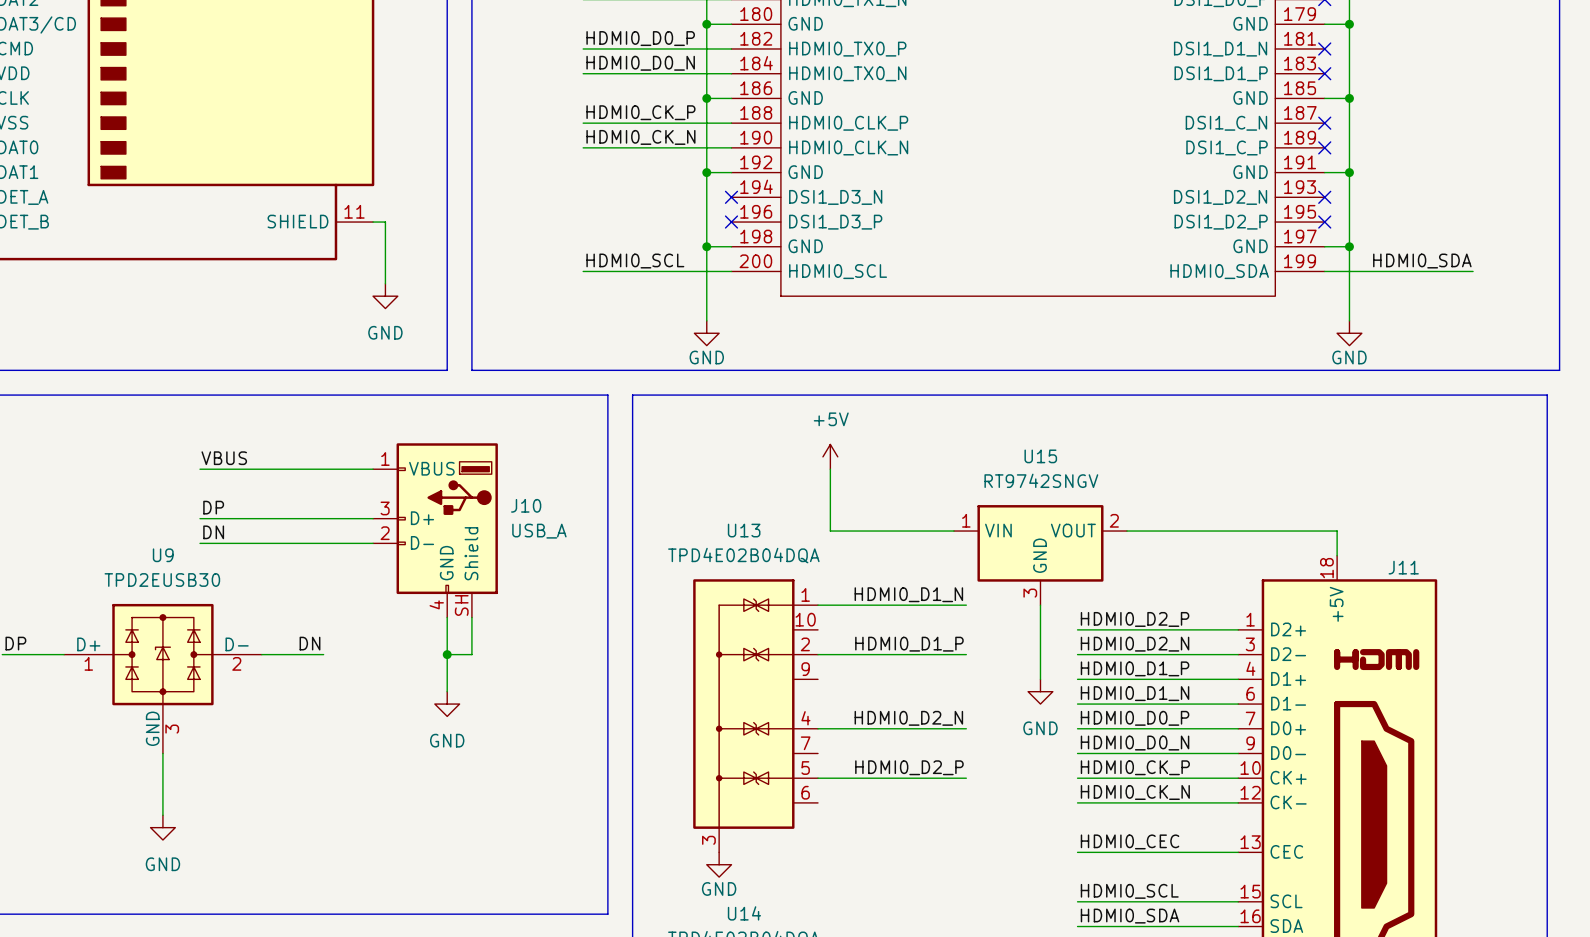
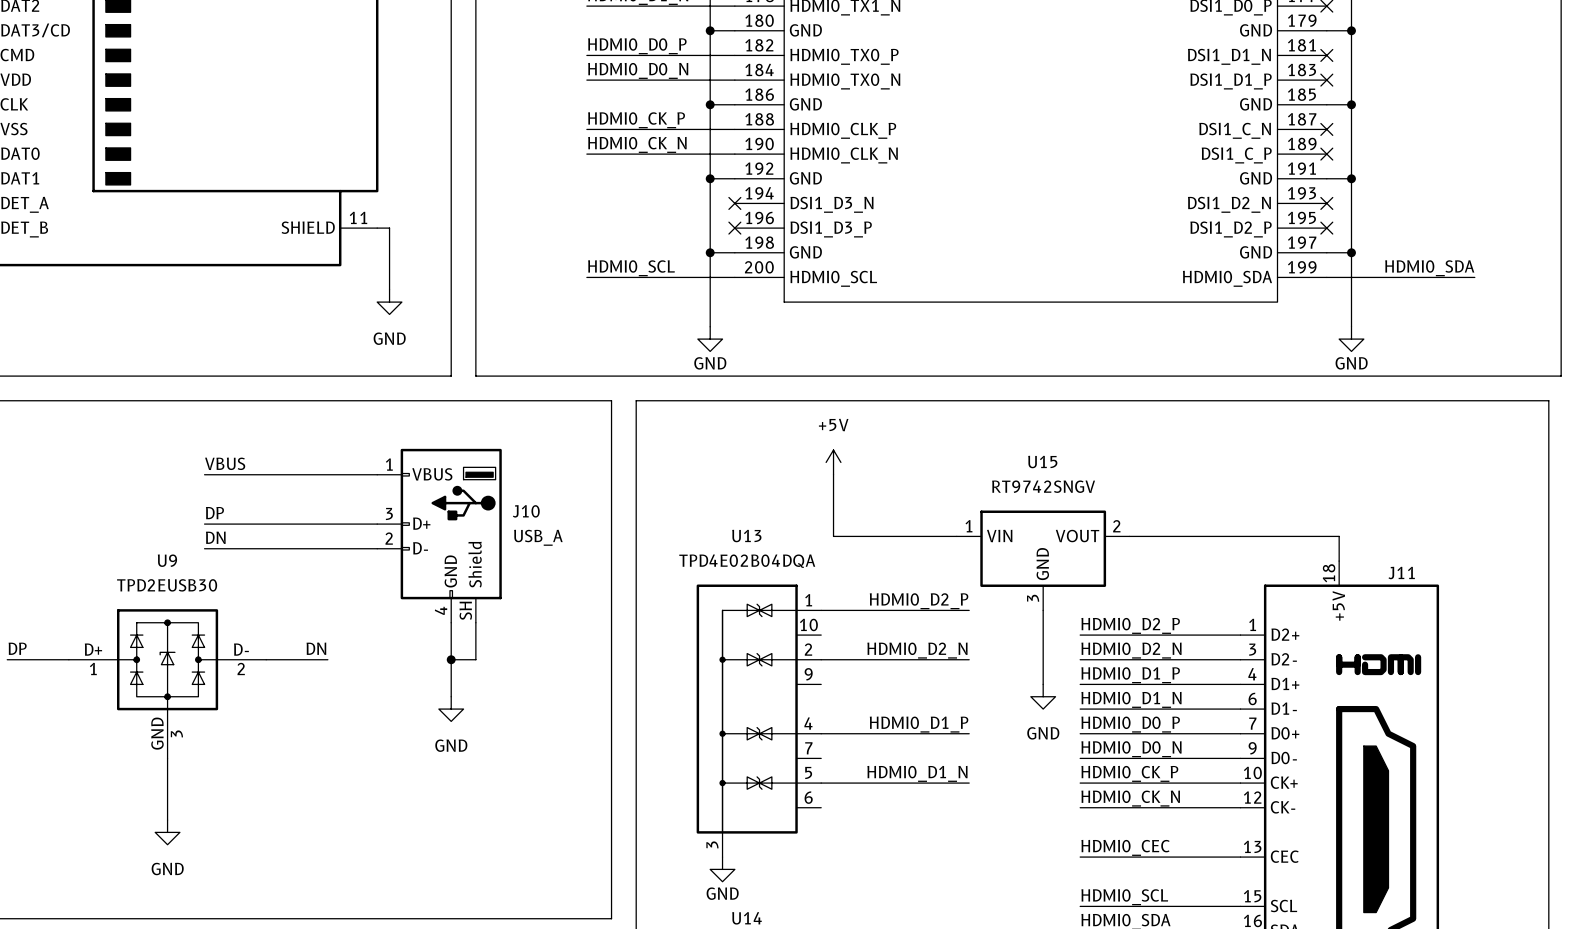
label: HDMI0_D1_N (908, 594) -> HDMI0_D2_P (919, 601)
label: HDMI0_D1_P (909, 644) -> HDMI0_D2_N (917, 650)
label: HDMI0_D2_N (908, 718) -> HDMI0_D1_P (919, 724)
label: HDMI0_D2_P (909, 767) -> HDMI0_D1_N (917, 773)

